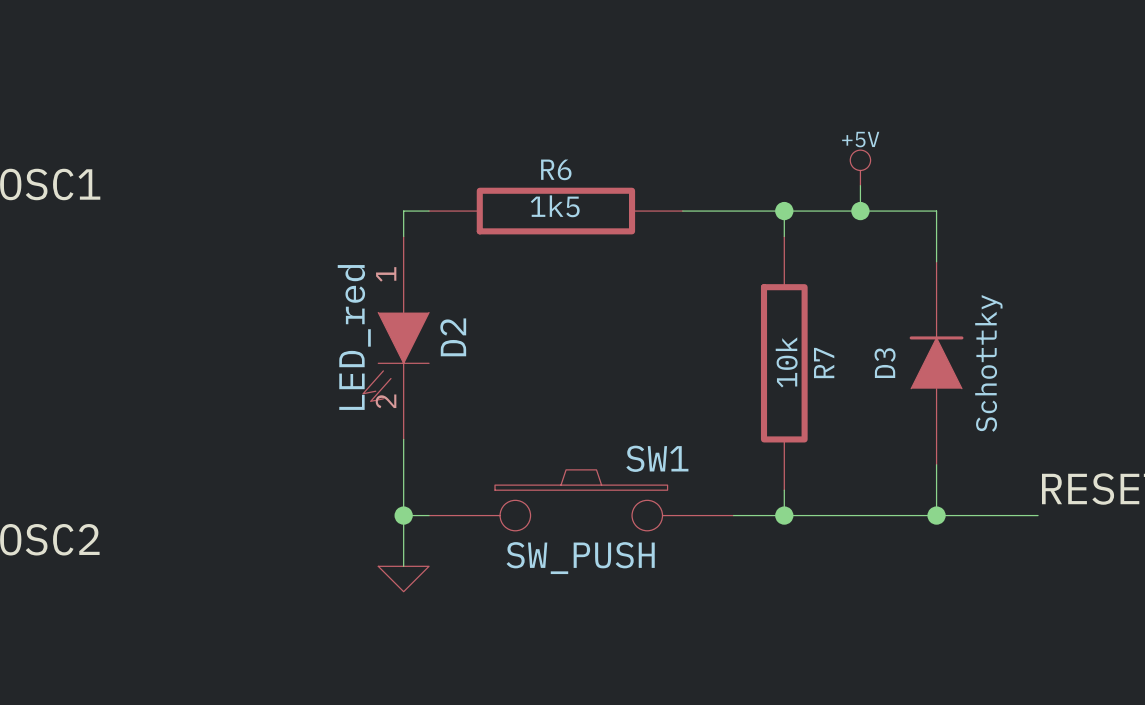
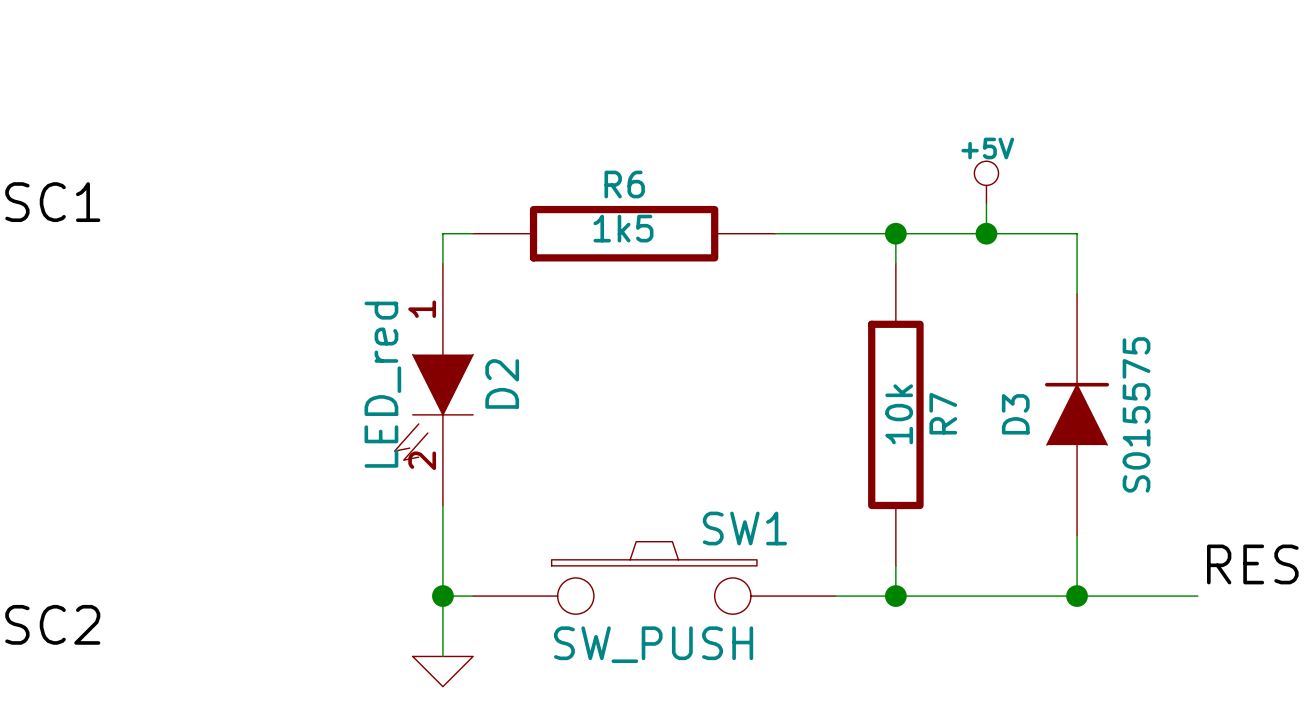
D3 value: Schottky (988, 363) -> S015575 (1136, 414)

